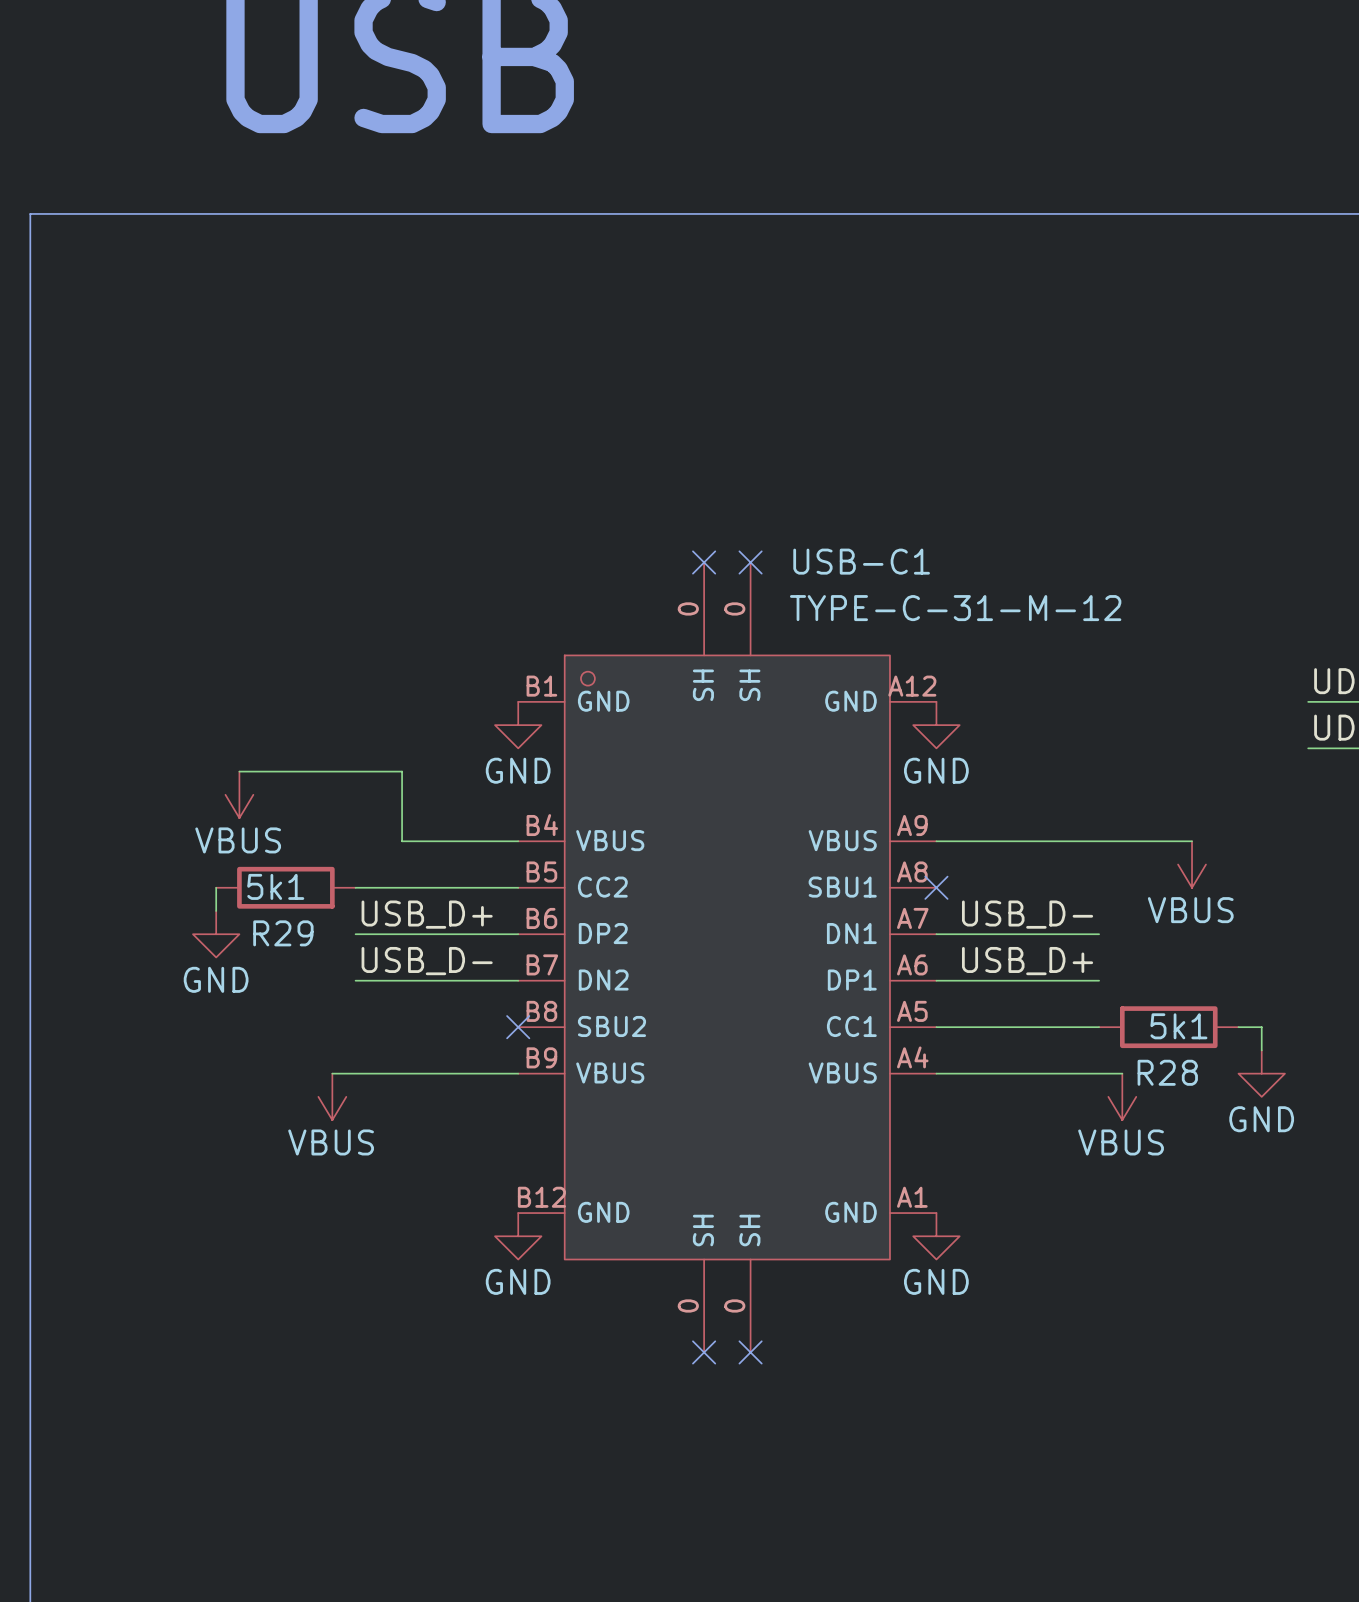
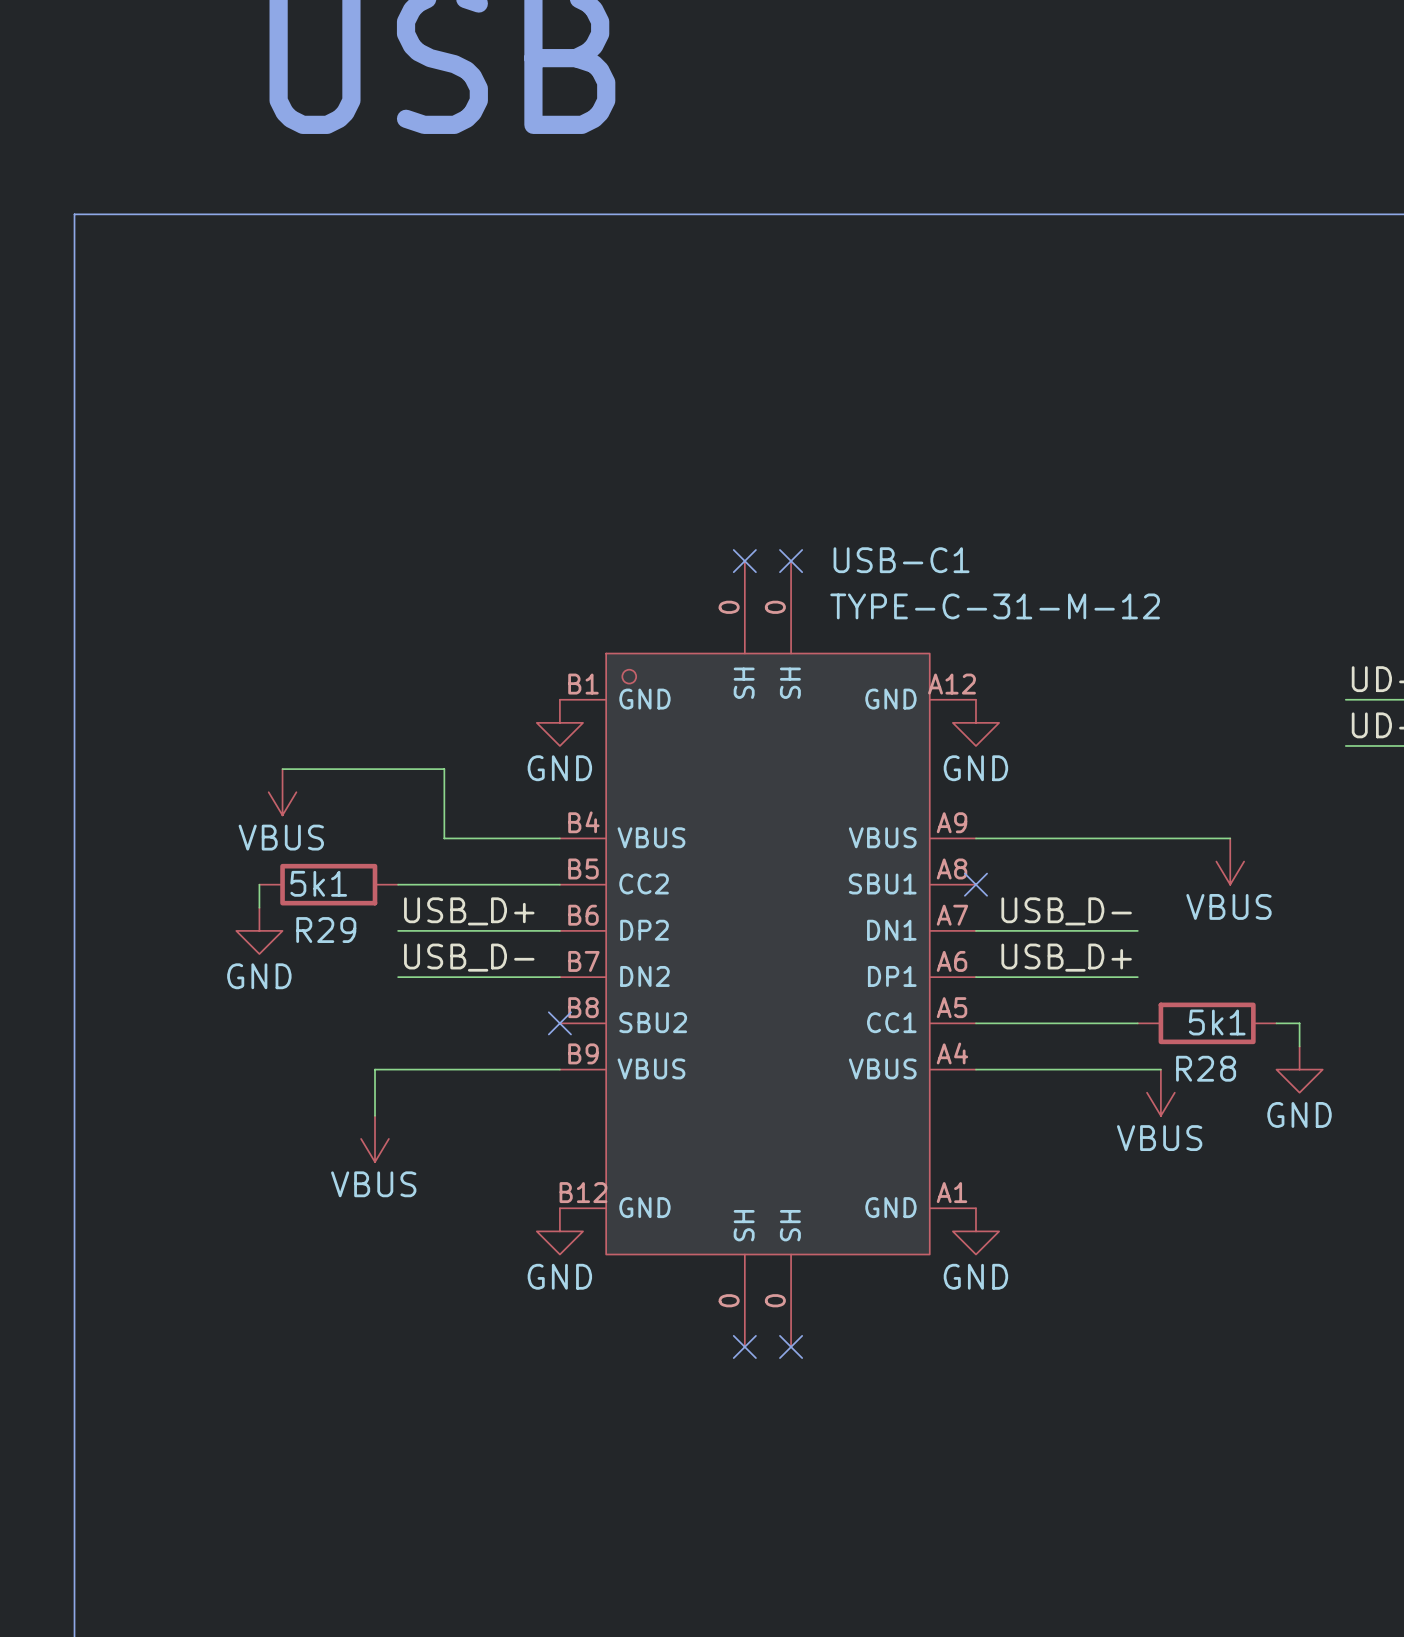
power symbol position: VBUS (332, 1096) -> VBUS (375, 1138)

